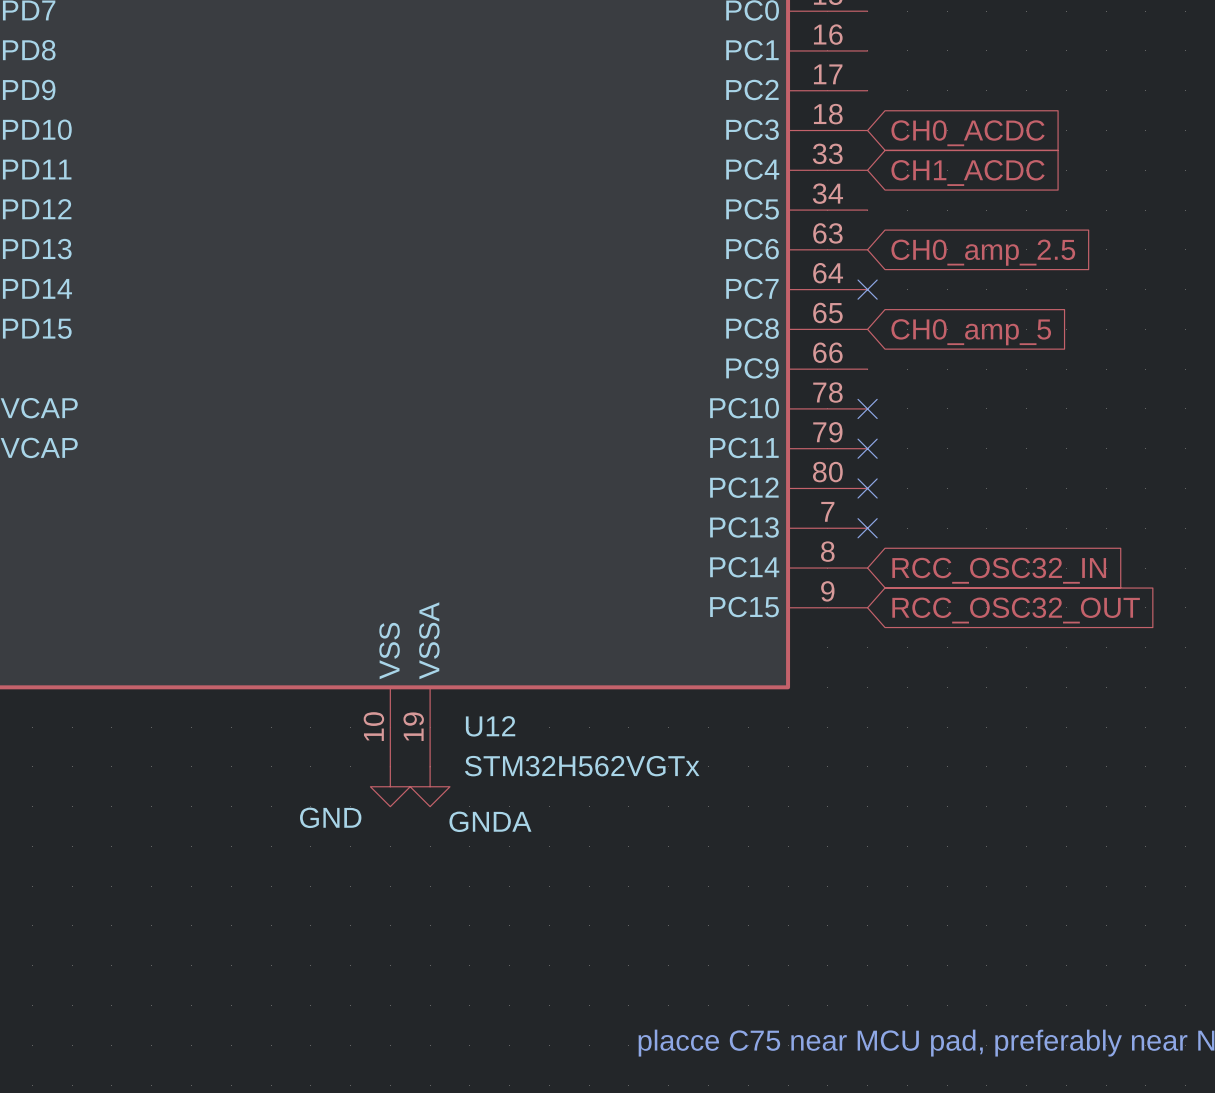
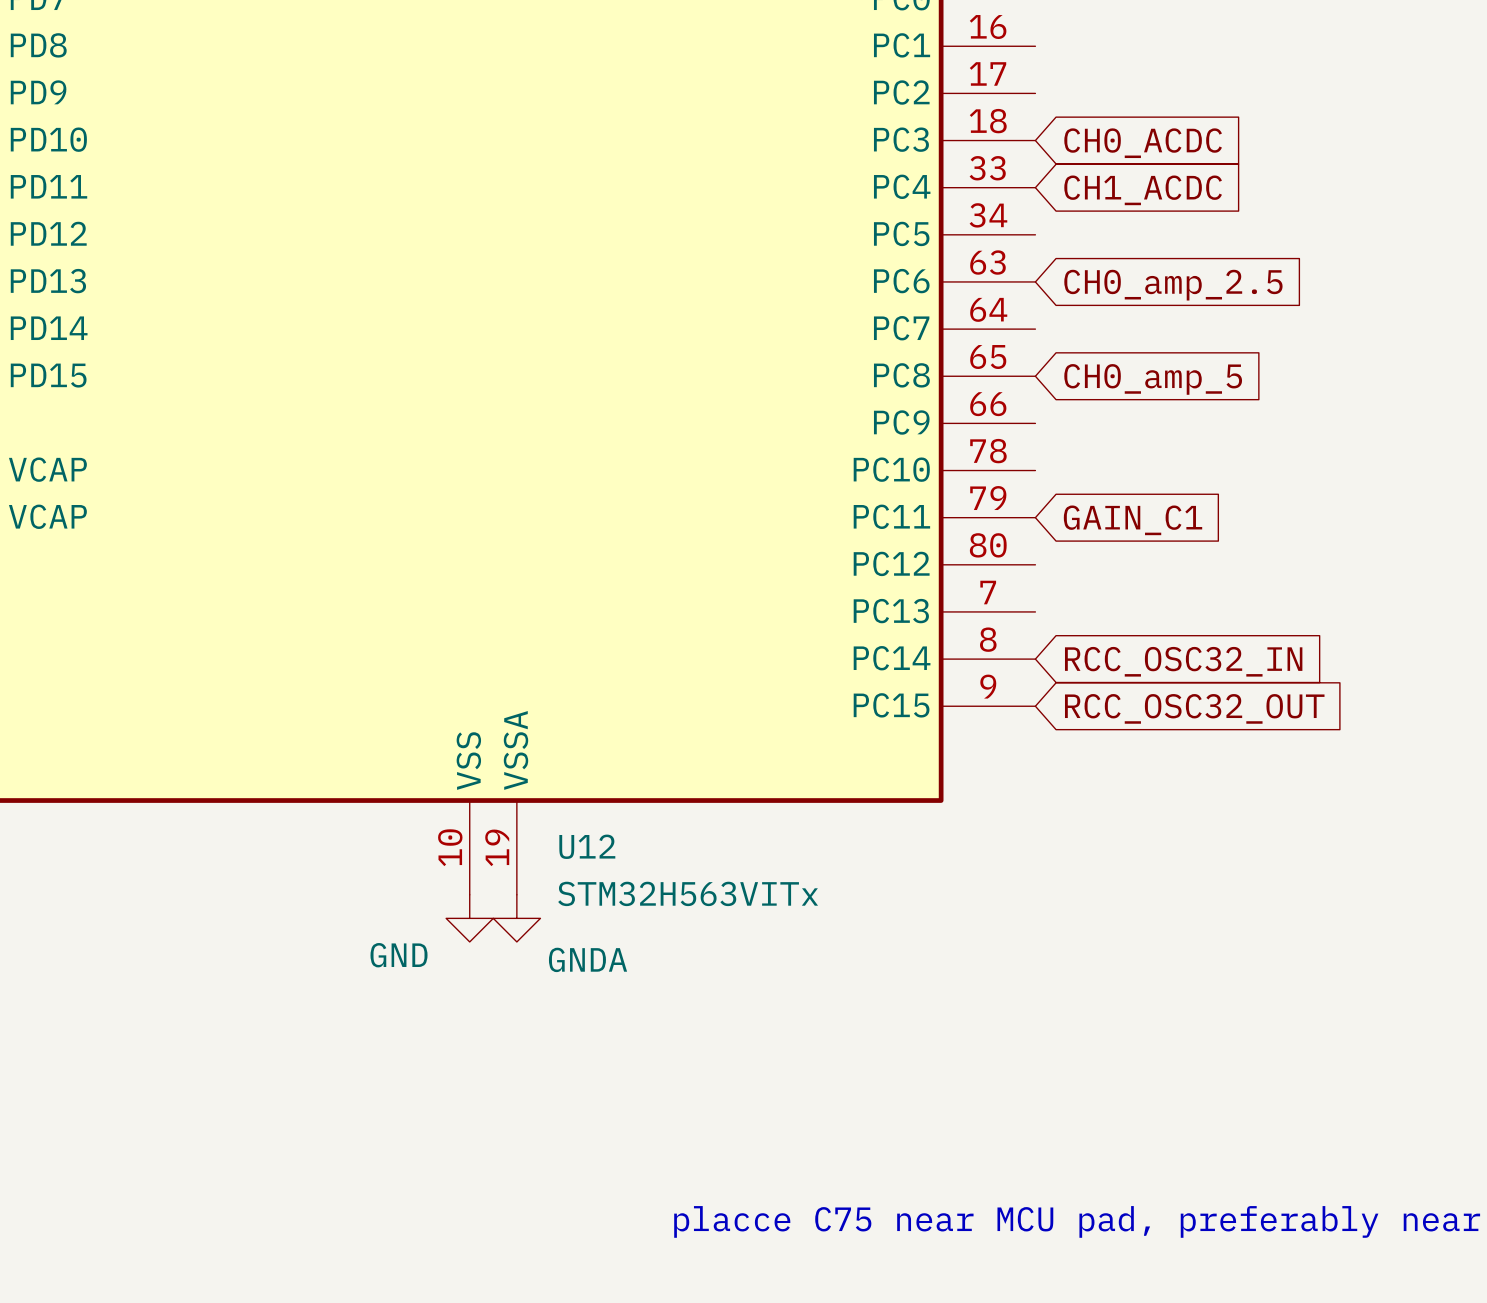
no-connect mark: (867, 289) -> none
no-connect mark: (867, 408) -> none
no-connect mark: (867, 448) -> none
global label: none -> GAIN_C1 (1133, 520)
no-connect mark: (867, 488) -> none
no-connect mark: (867, 528) -> none
U12 value: STM32H562VGTx (582, 766) -> STM32H563VITx (688, 893)

